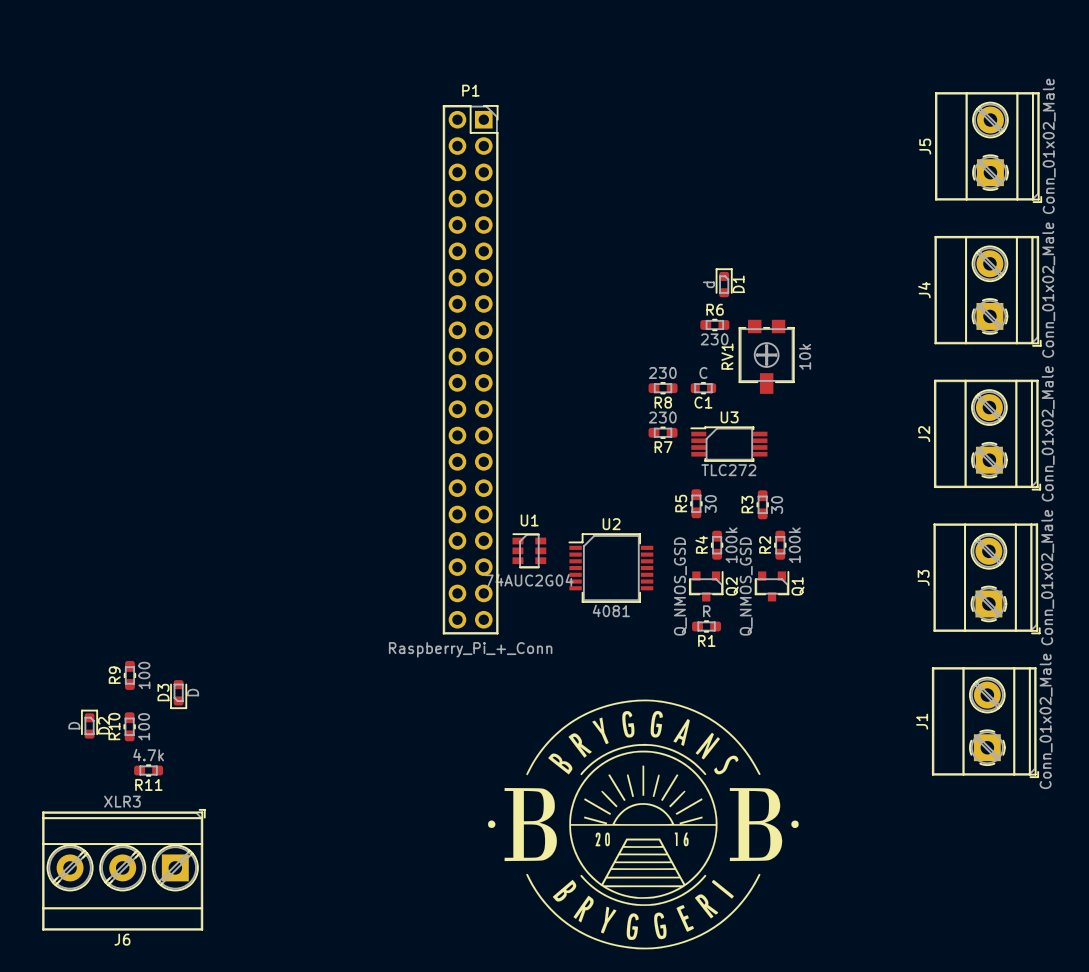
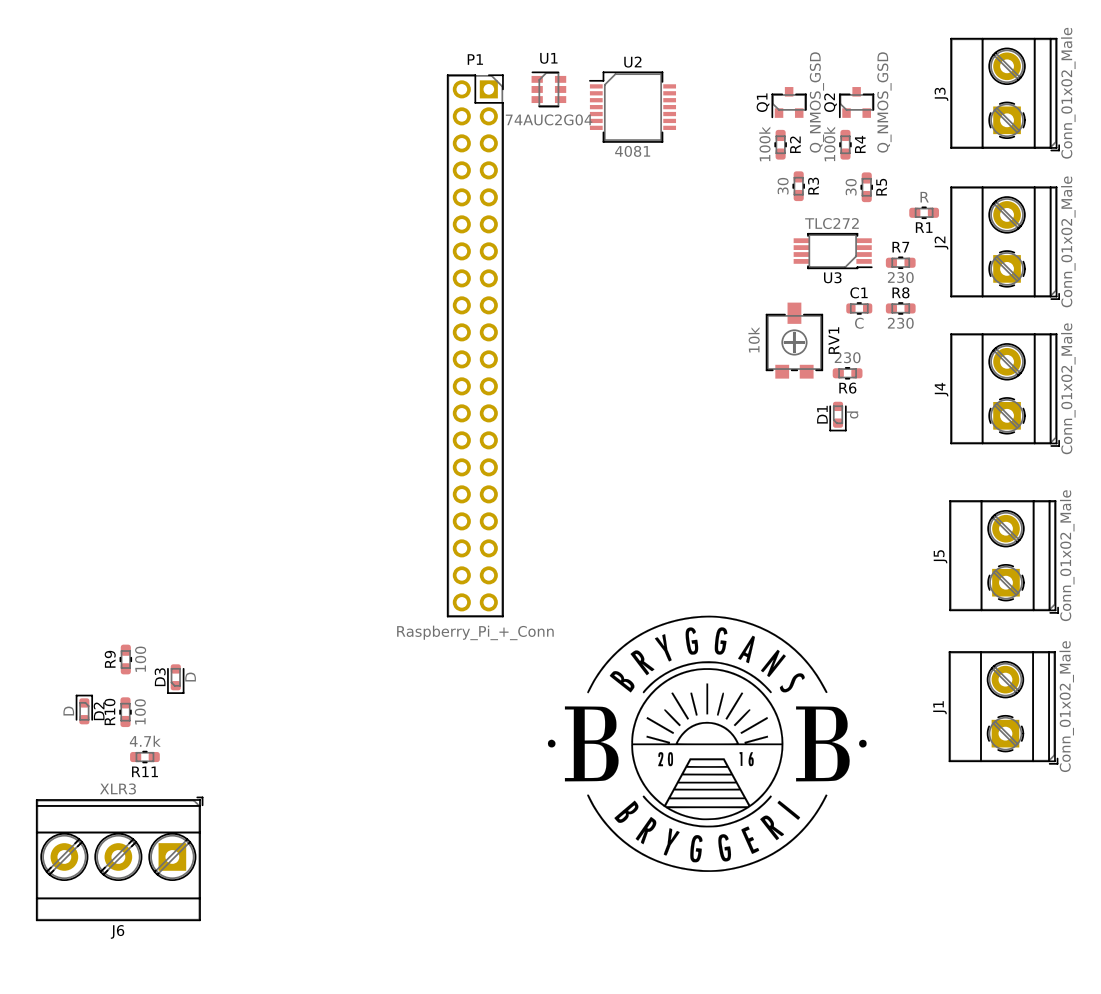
J5 position: (988, 147) -> (1004, 556)
D1 rotation: 0° (724, 282) -> 180° (838, 416)
D1 position: (724, 282) -> (838, 416)
J4 position: (988, 291) -> (1005, 390)
R6 name position: R6 (715, 309) -> R6 (847, 388)
R6 position: (714, 324) -> (847, 373)
R6 value position: 230 (714, 339) -> 230 (847, 357)
RV1 rotation: 0° (766, 356) -> 180° (794, 340)
R8 value position: 230 (662, 372) -> 230 (900, 323)
C1 value position: C (703, 372) -> C (859, 323)
R8 position: (663, 388) -> (900, 308)
C1 position: (703, 388) -> (859, 308)
R8 name position: R8 (663, 402) -> R8 (900, 292)
C1 name position: C1 (703, 402) -> C1 (859, 292)
R7 value position: 230 (662, 417) -> 230 (900, 277)
R7 position: (663, 432) -> (900, 262)
J2 position: (987, 435) -> (1005, 243)
U3 rotation: 0° (728, 444) -> 180° (833, 251)
U3 position: (728, 444) -> (833, 251)
R7 name position: R7 (663, 447) -> R7 (900, 247)
R5 name position: R5 (681, 503) -> R5 (881, 187)
R5 position: (696, 503) -> (866, 187)
R5 value position: 30 (710, 504) -> 30 (851, 187)
R3 name position: R3 (747, 504) -> R3 (813, 186)
R3 position: (762, 504) -> (798, 186)
R3 value position: 30 (777, 505) -> 30 (783, 186)
R4 name position: R4 (701, 544) -> R4 (860, 144)
R2 name position: R2 (765, 544) -> R2 (795, 144)
R4 position: (717, 545) -> (845, 144)
R4 value position: 100k (731, 545) -> 100k (829, 143)
R2 position: (780, 545) -> (780, 144)
R2 value position: 100k (794, 545) -> 100k (764, 143)
U1 position: (529, 550) -> (548, 89)
U2 position: (610, 568) -> (632, 107)
J3 position: (987, 578) -> (1005, 94)
Q2 rotation: 0° (706, 586) -> 180° (856, 102)
Q2 position: (706, 586) -> (856, 102)
Q1 rotation: 0° (772, 586) -> 180° (789, 102)
Q1 position: (772, 586) -> (789, 102)
R1 position: (706, 626) -> (924, 212)
drawing position: (643, 824) -> (707, 743)

